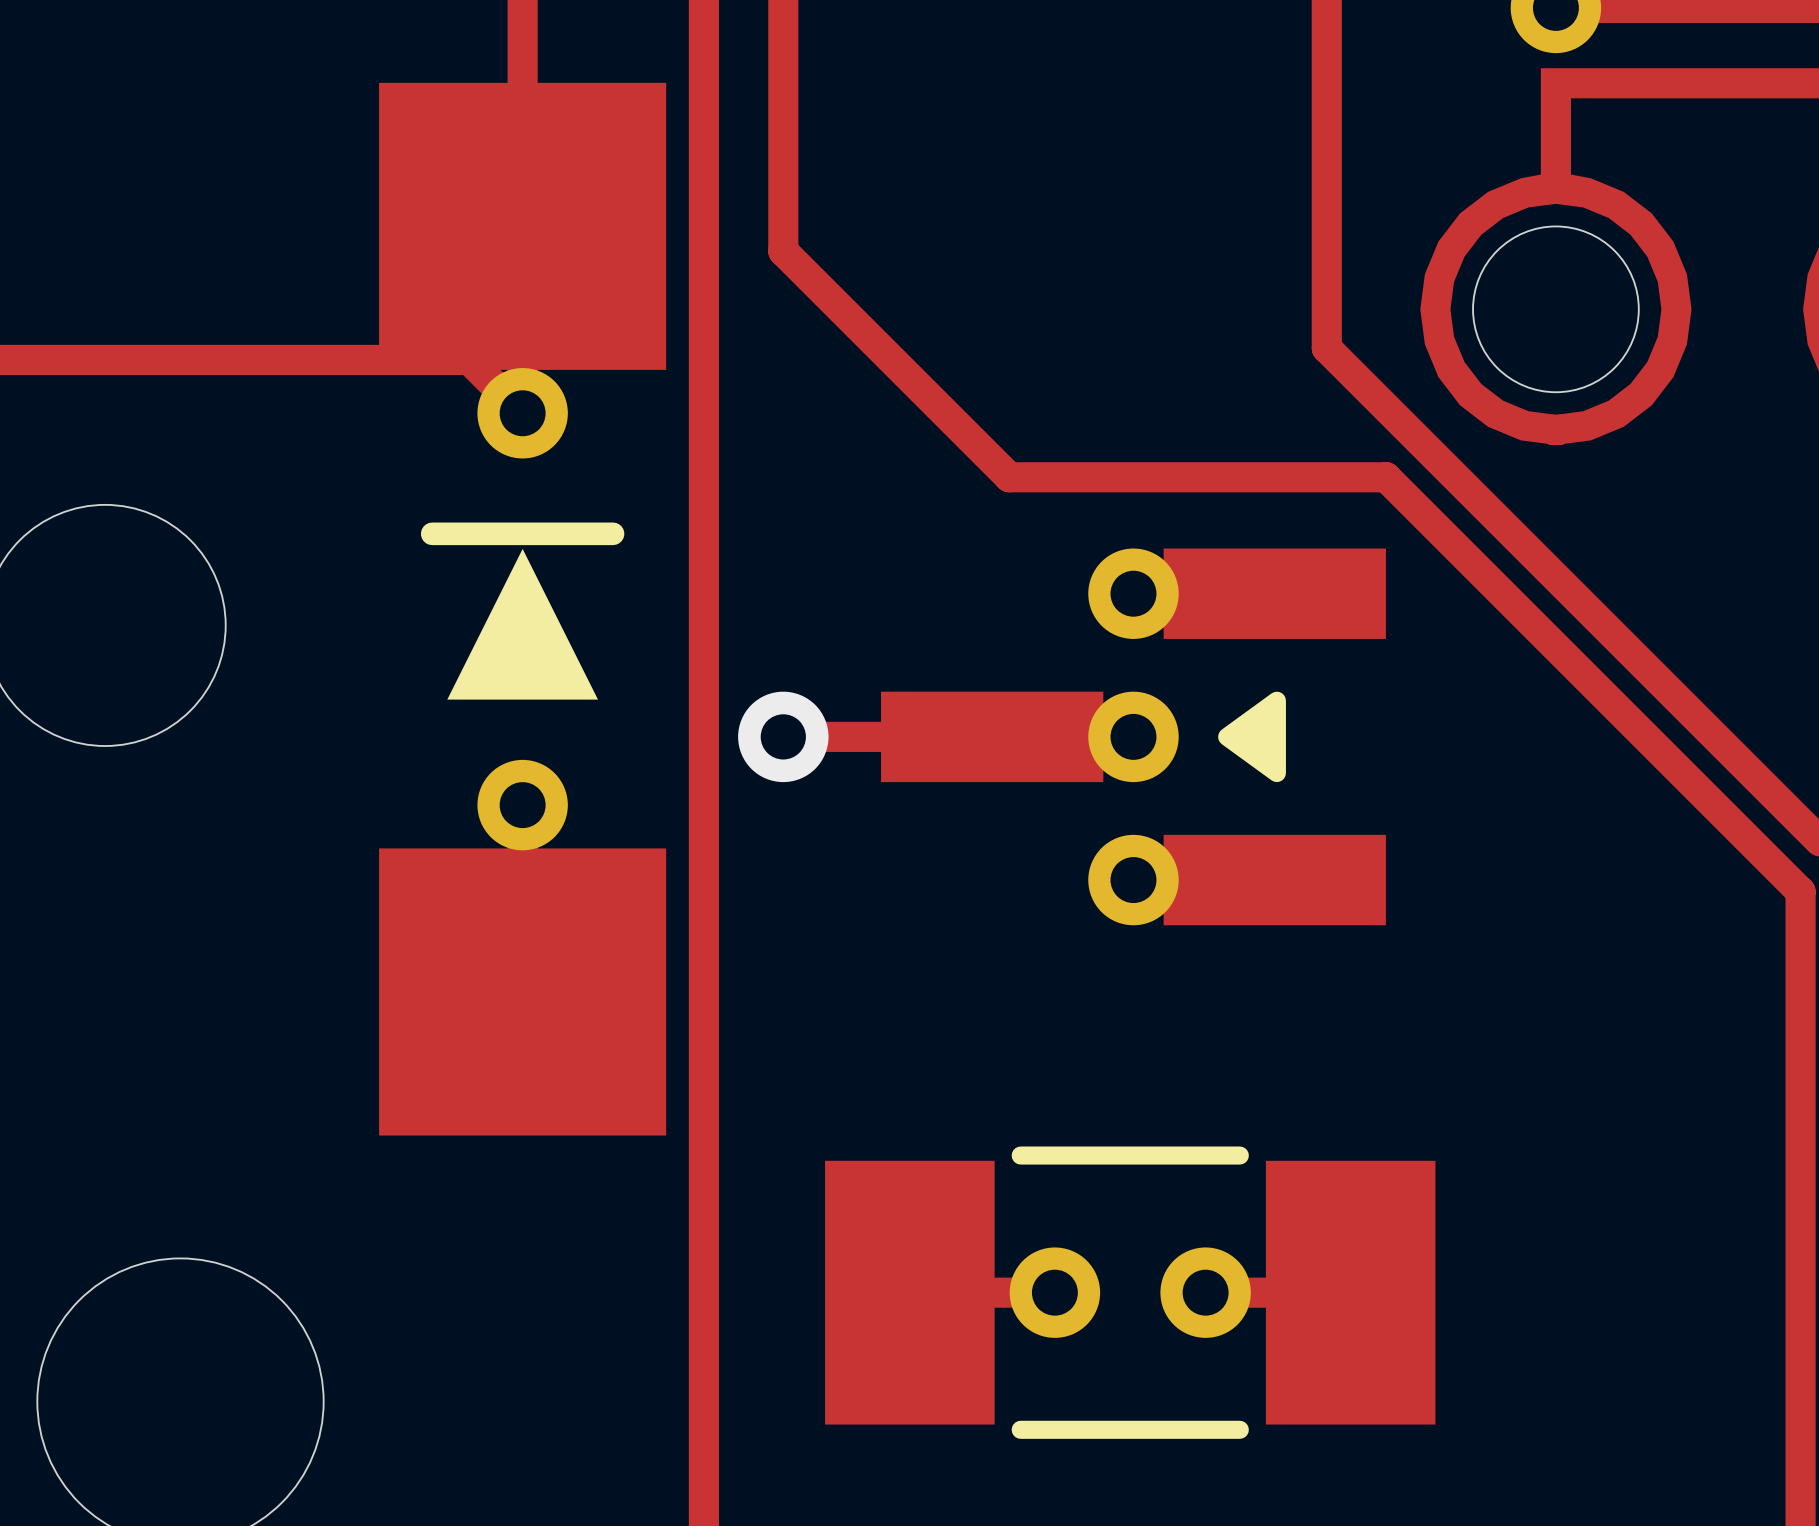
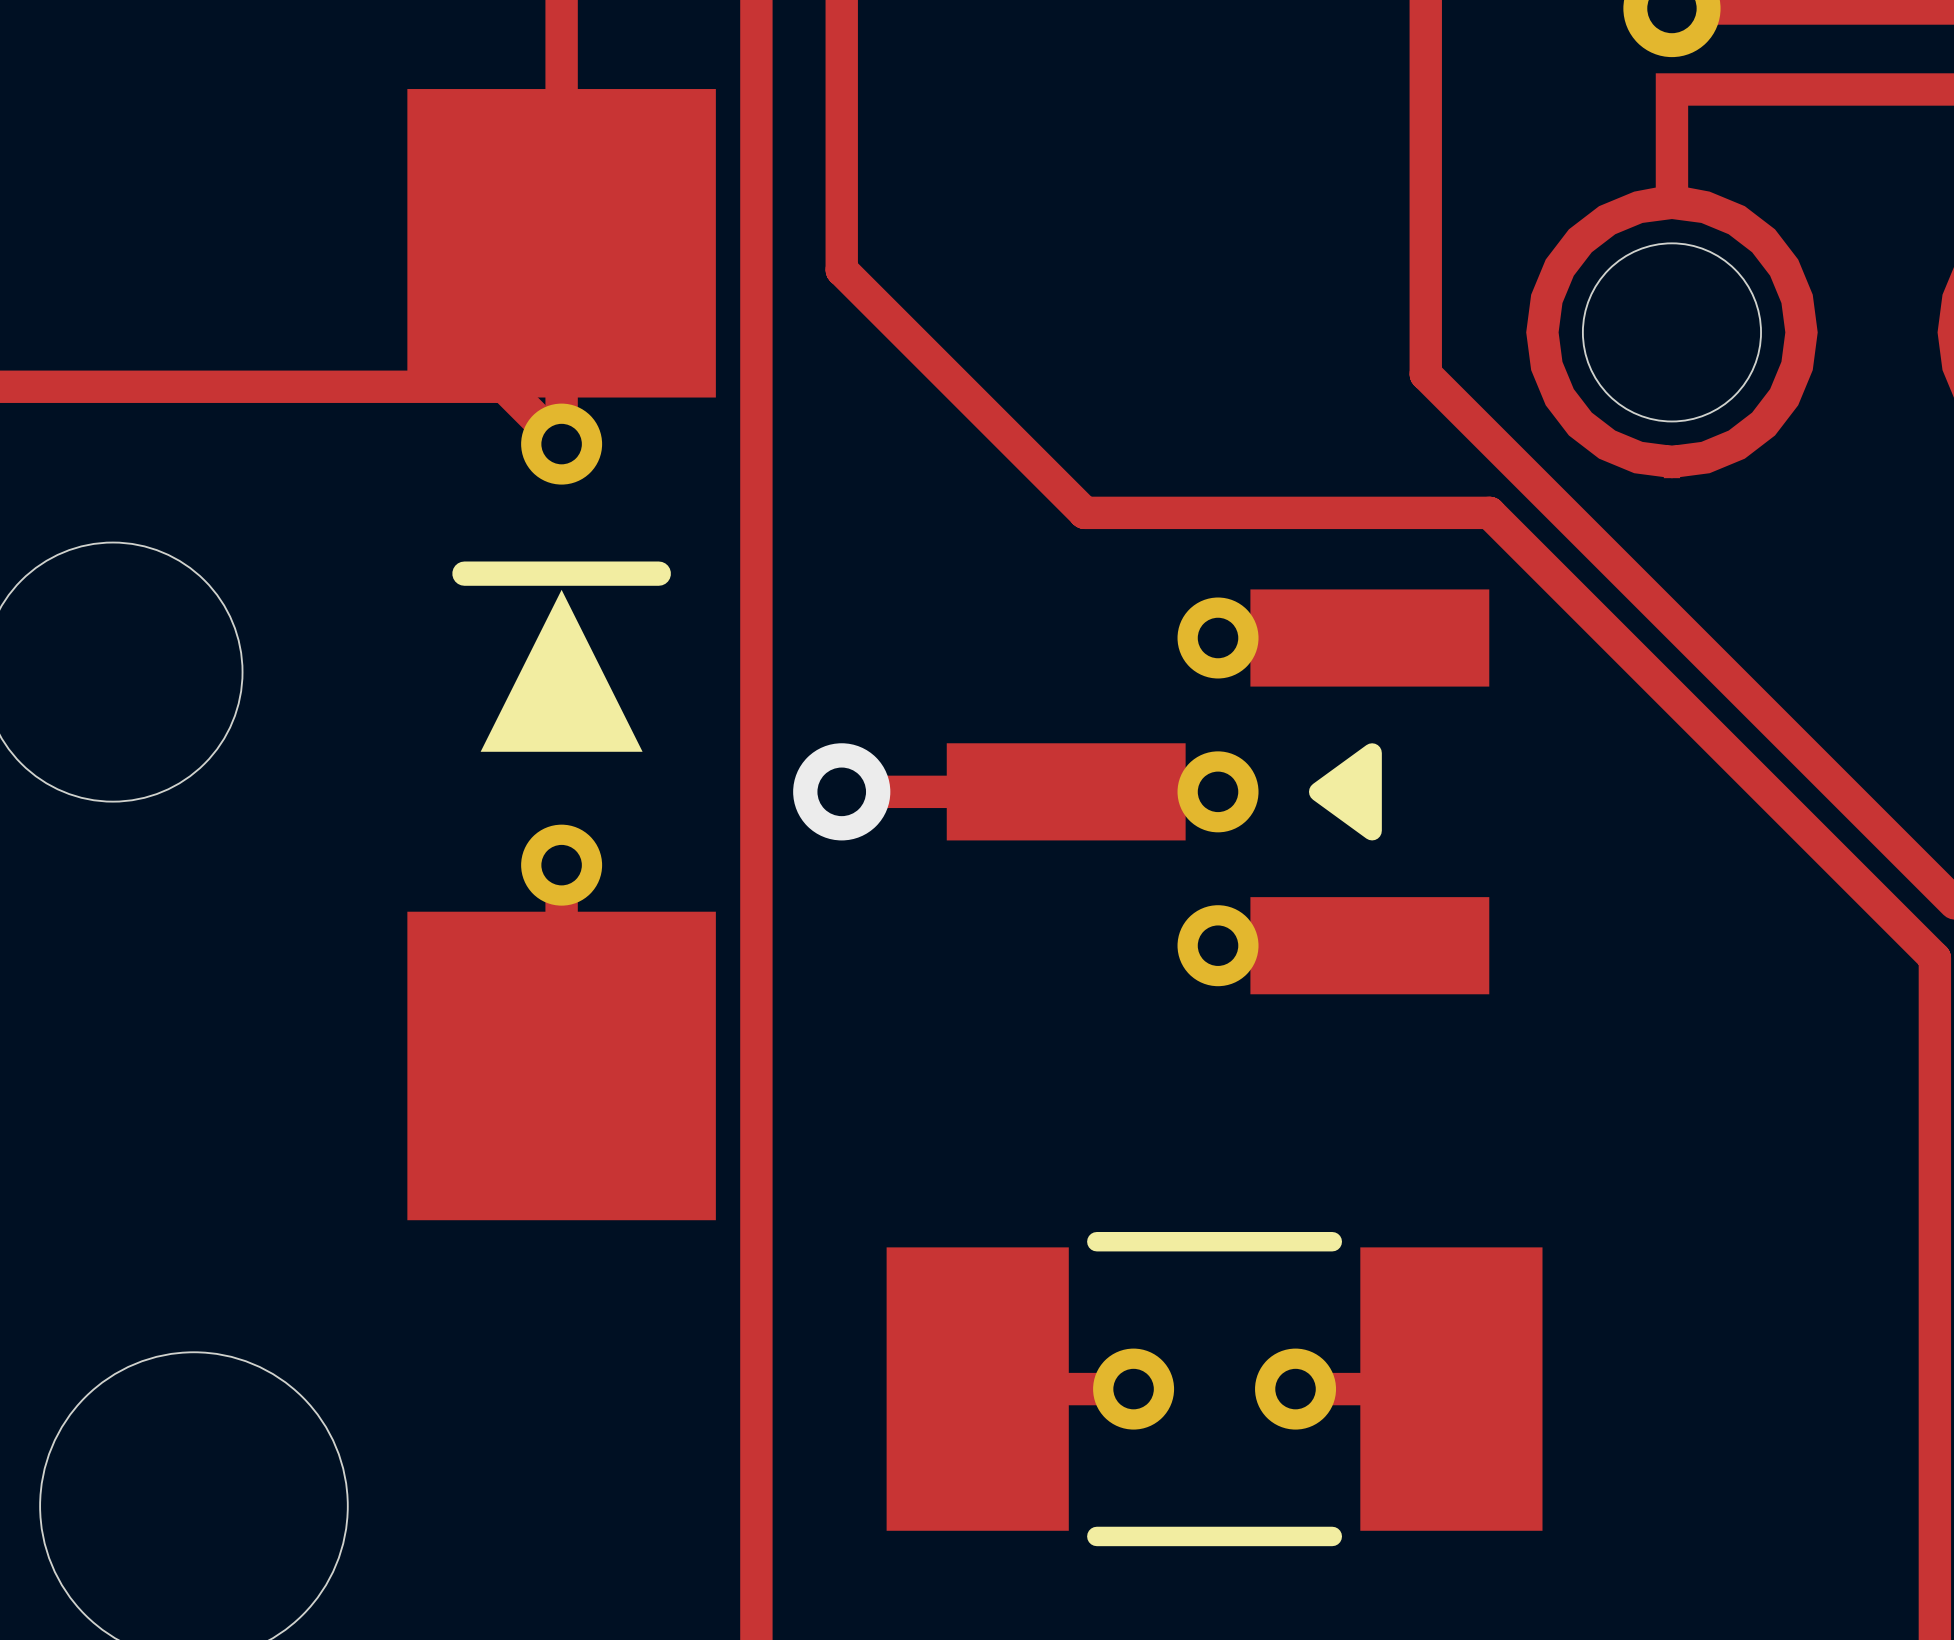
part footprint: [379, 82, 667, 1136] -> [407, 89, 716, 1221]
part footprint: [881, 548, 1386, 926] -> [946, 589, 1490, 995]
part footprint: [825, 1146, 1436, 1439] -> [886, 1231, 1543, 1547]

